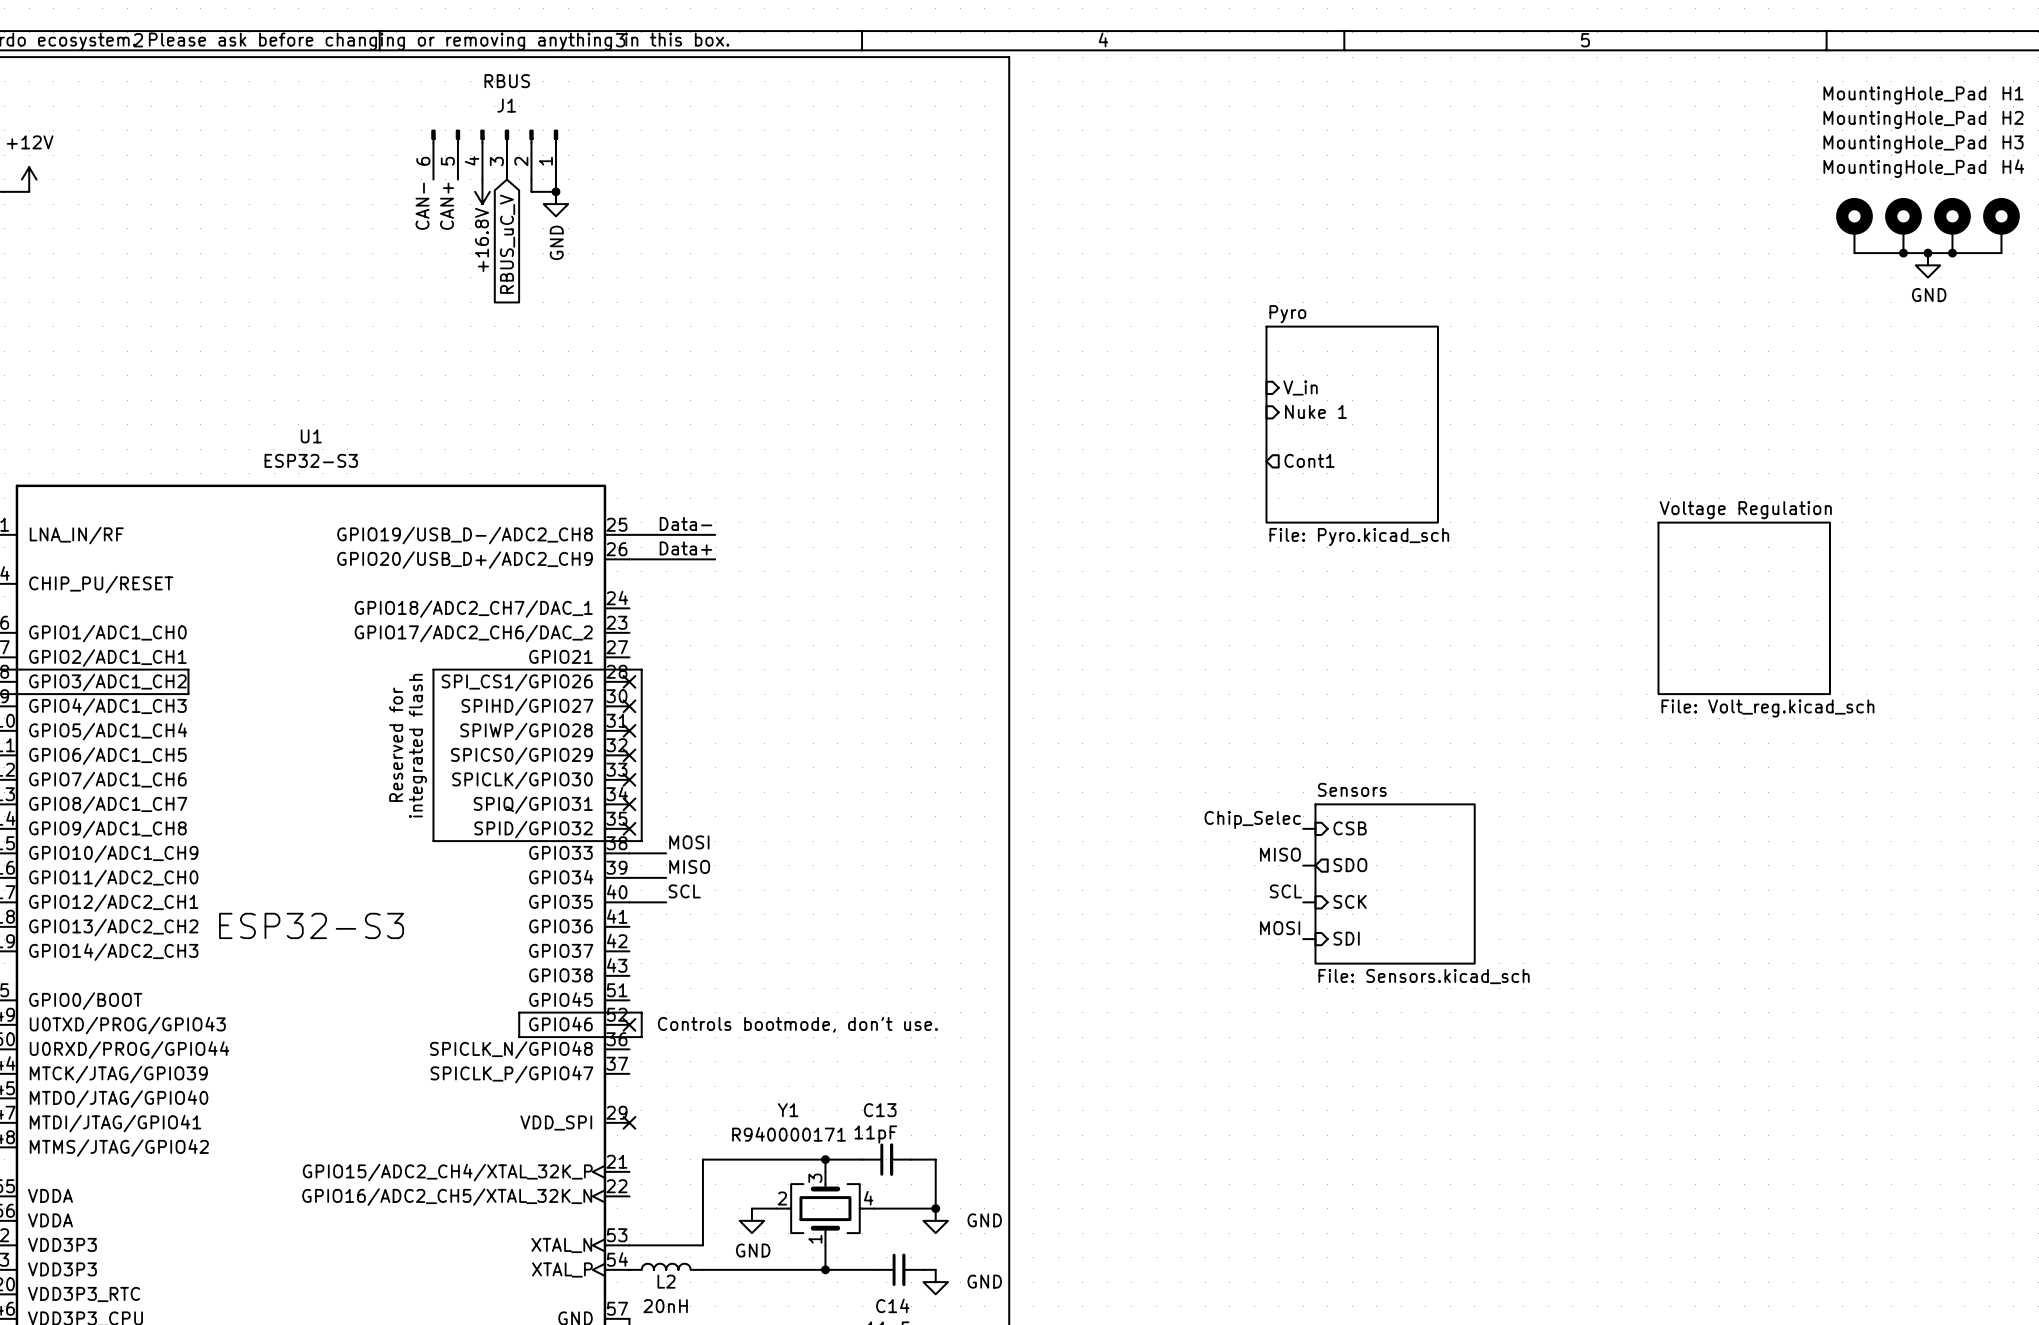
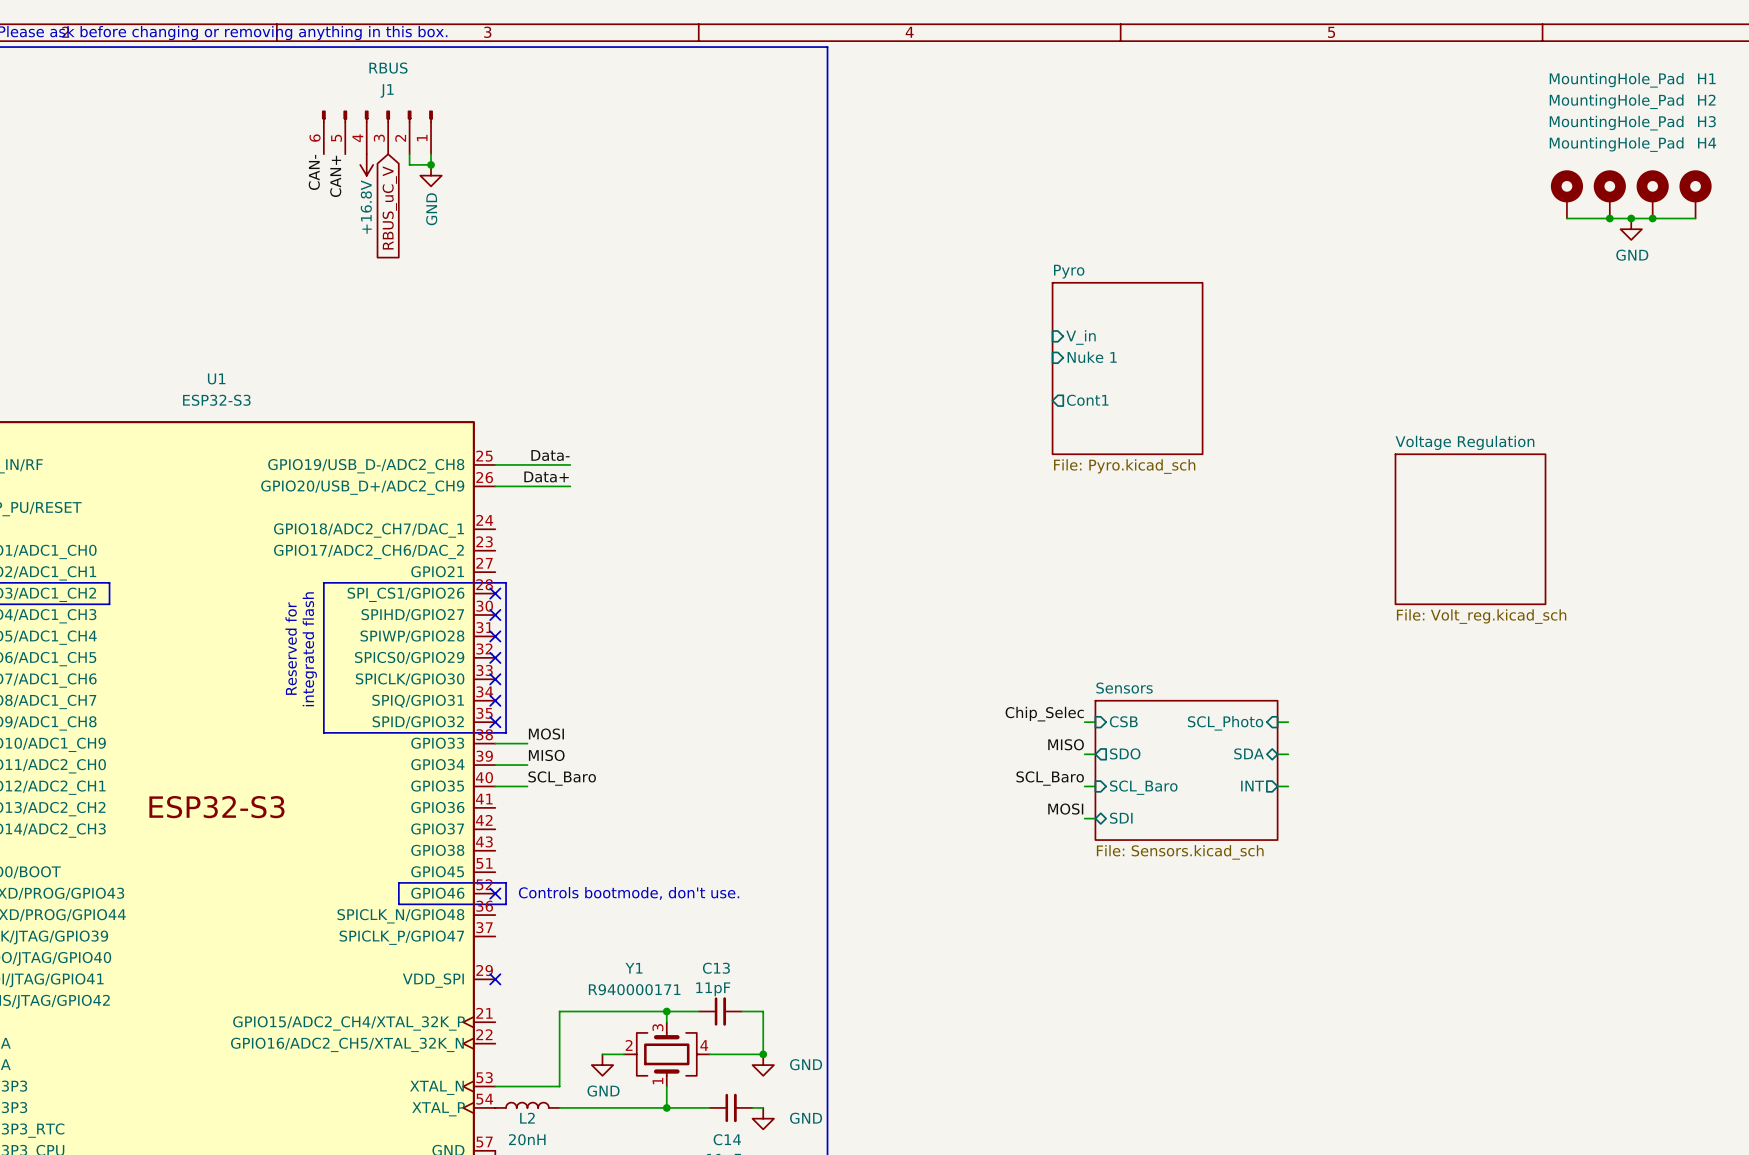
sheet pin: none -> SCL_Photo (1225, 723)
wire: none -> (1277, 722) (1288, 722)
sheet pin: none -> SDA (1249, 753)
wire: none -> (1277, 754) (1288, 754)
sheet Sensors: File: Sensors.kicad_sch (1395, 883) -> none
sheet Sensors: none -> File: Sensors.kicad_sch (1186, 770)
label: SCL (684, 891) -> SCL_Baro (562, 778)
label: SCL (1285, 891) -> SCL_Baro (1050, 778)
sheet pin: SCK (1350, 901) -> SCL_Baro (1143, 787)
sheet pin: none -> INT (1252, 786)
wire: none -> (1277, 786) (1288, 786)
sheet pin shape: input (1346, 938) -> bidirectional (1121, 818)

